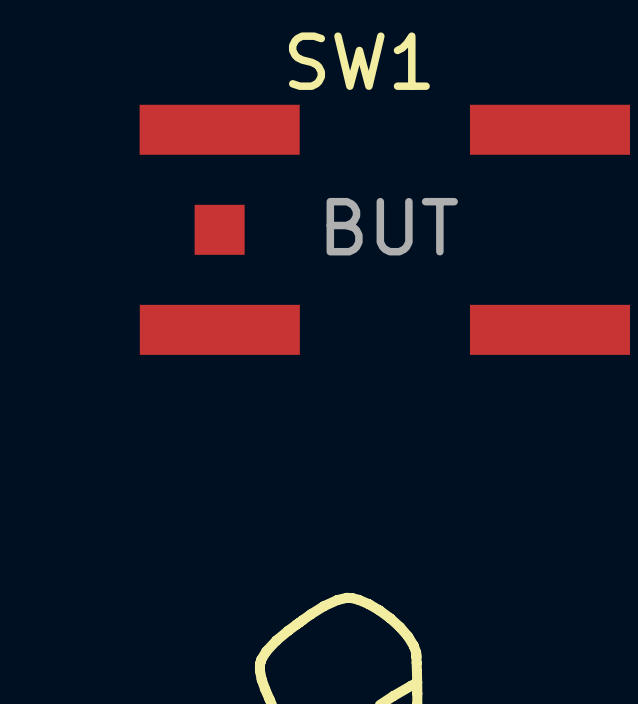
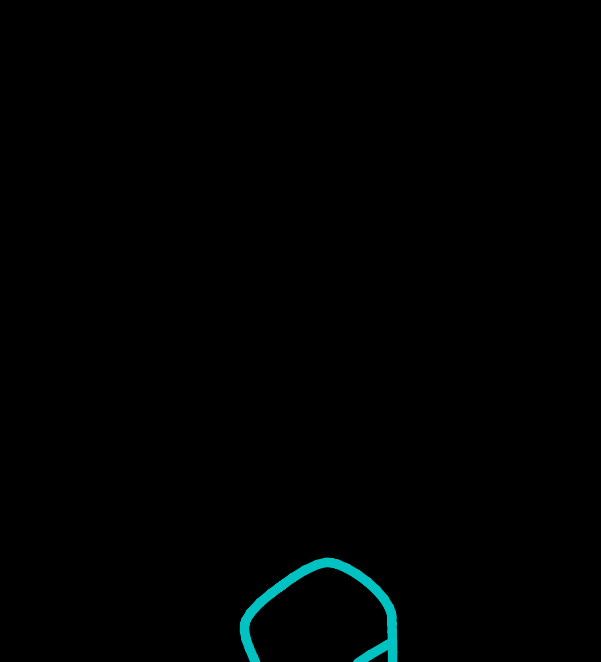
SW1: BUT (384, 229) -> none

